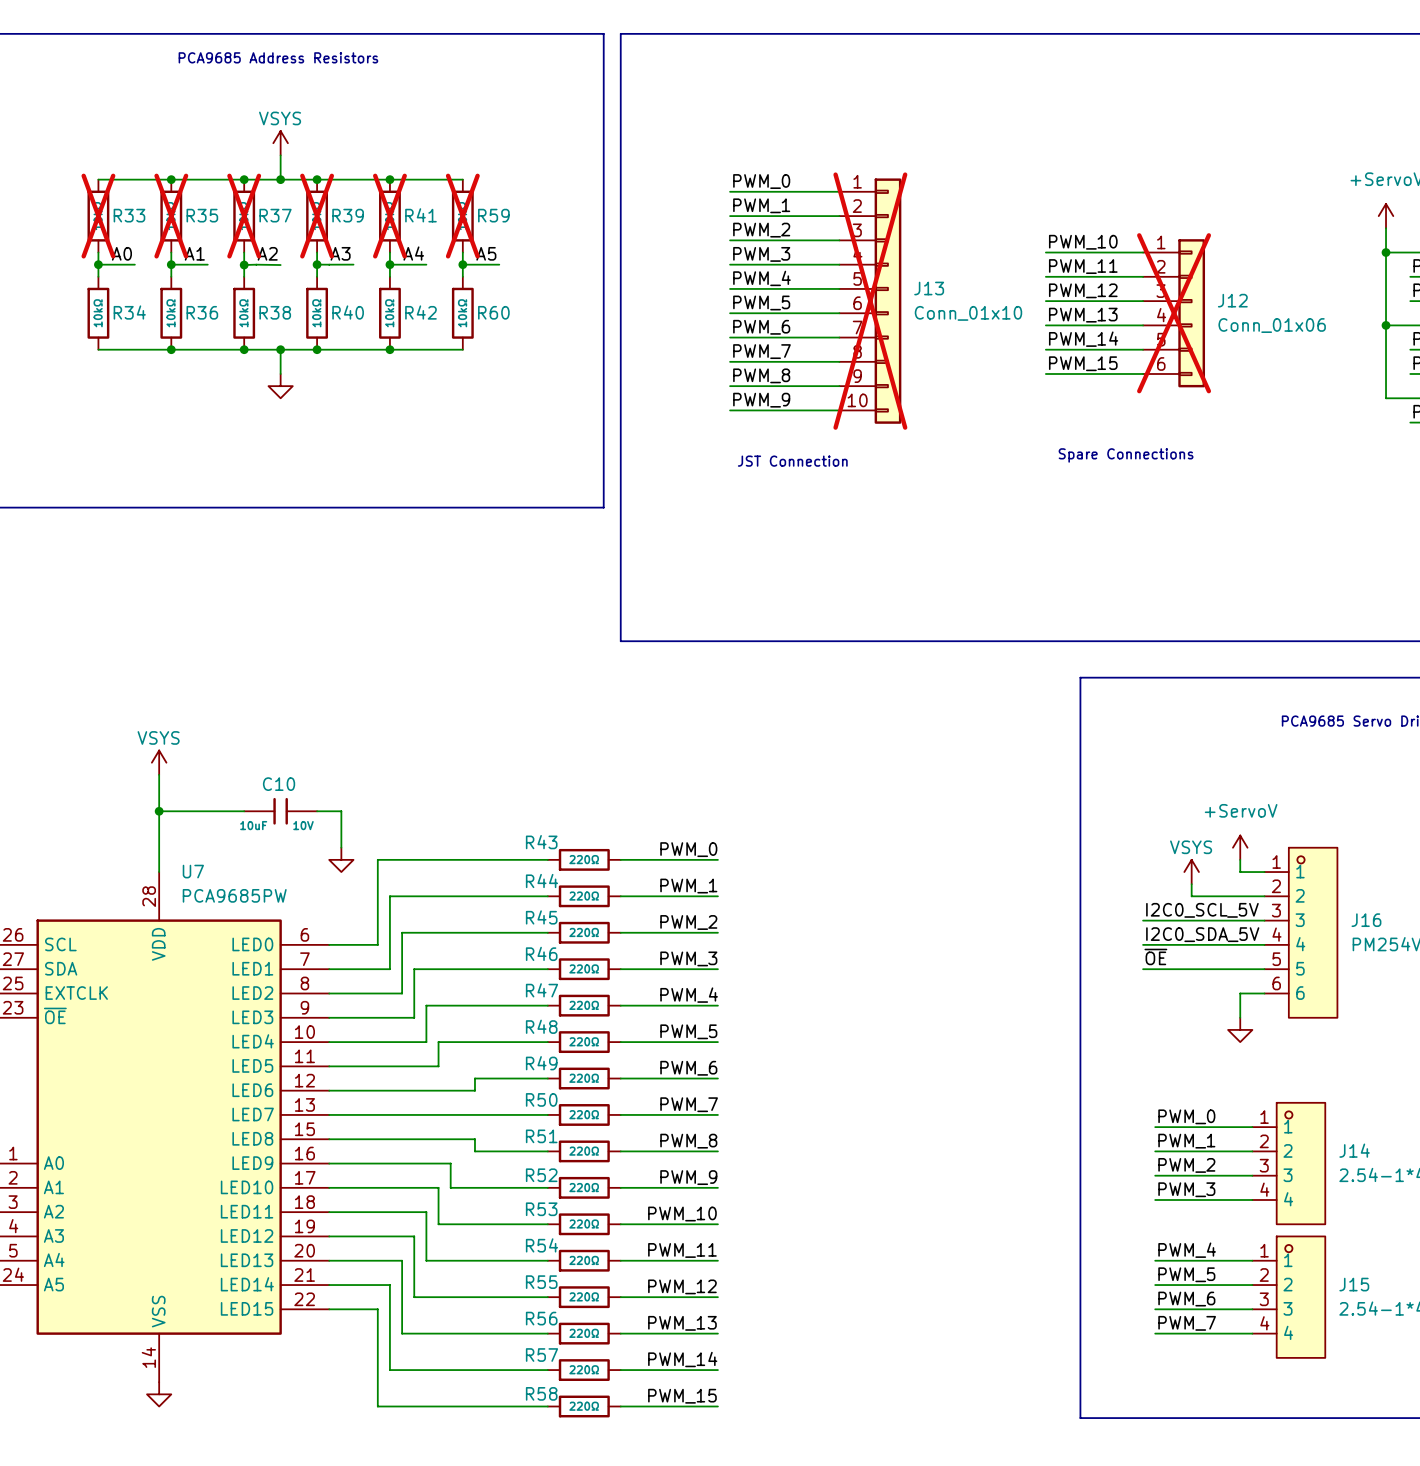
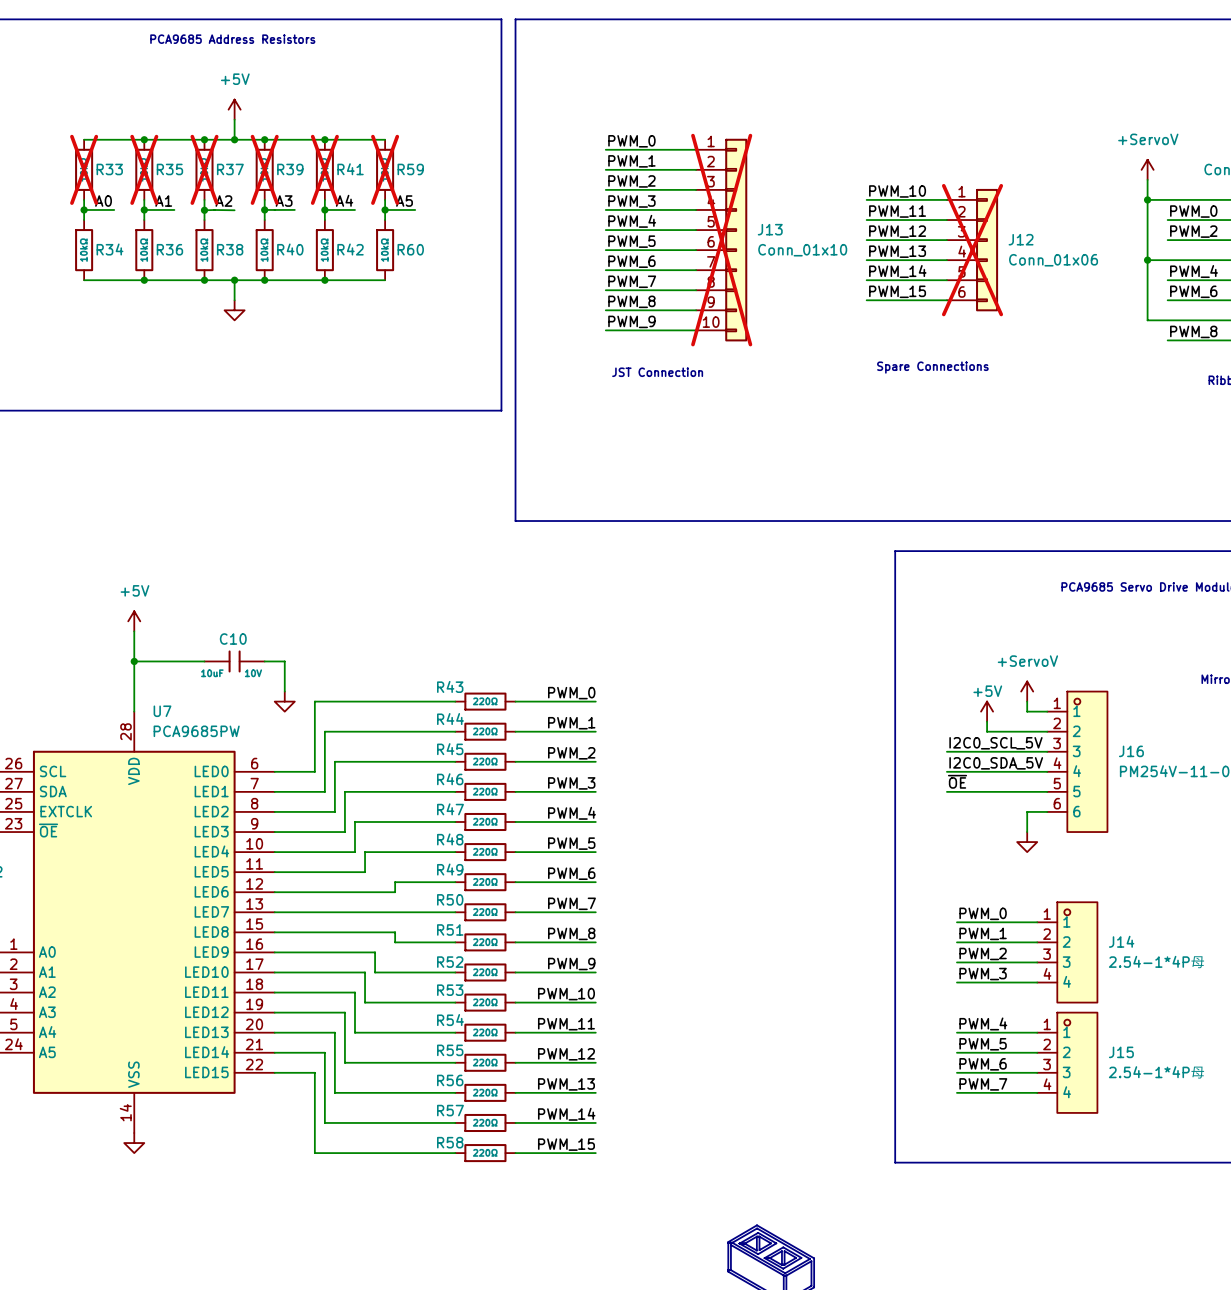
power symbol: VSYS (280, 143) -> +5V (234, 109)
power symbol: VSYS (159, 762) -> +5V (134, 621)
power symbol: VSYS (1191, 872) -> +5V (987, 711)

